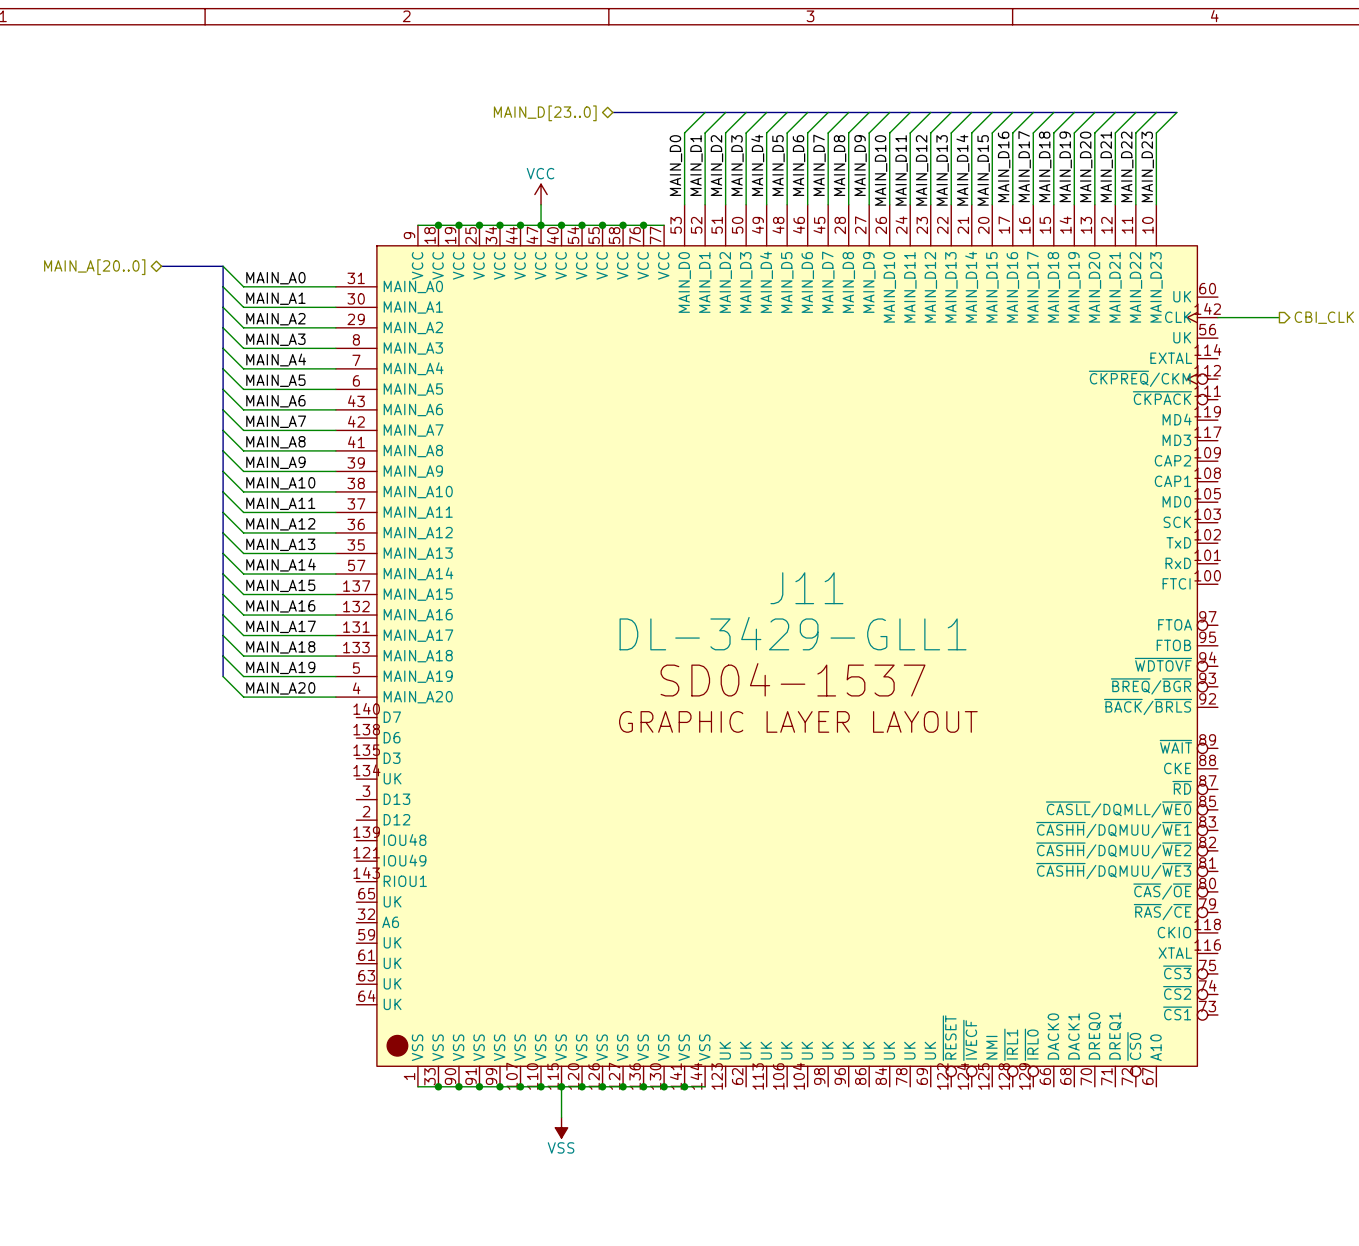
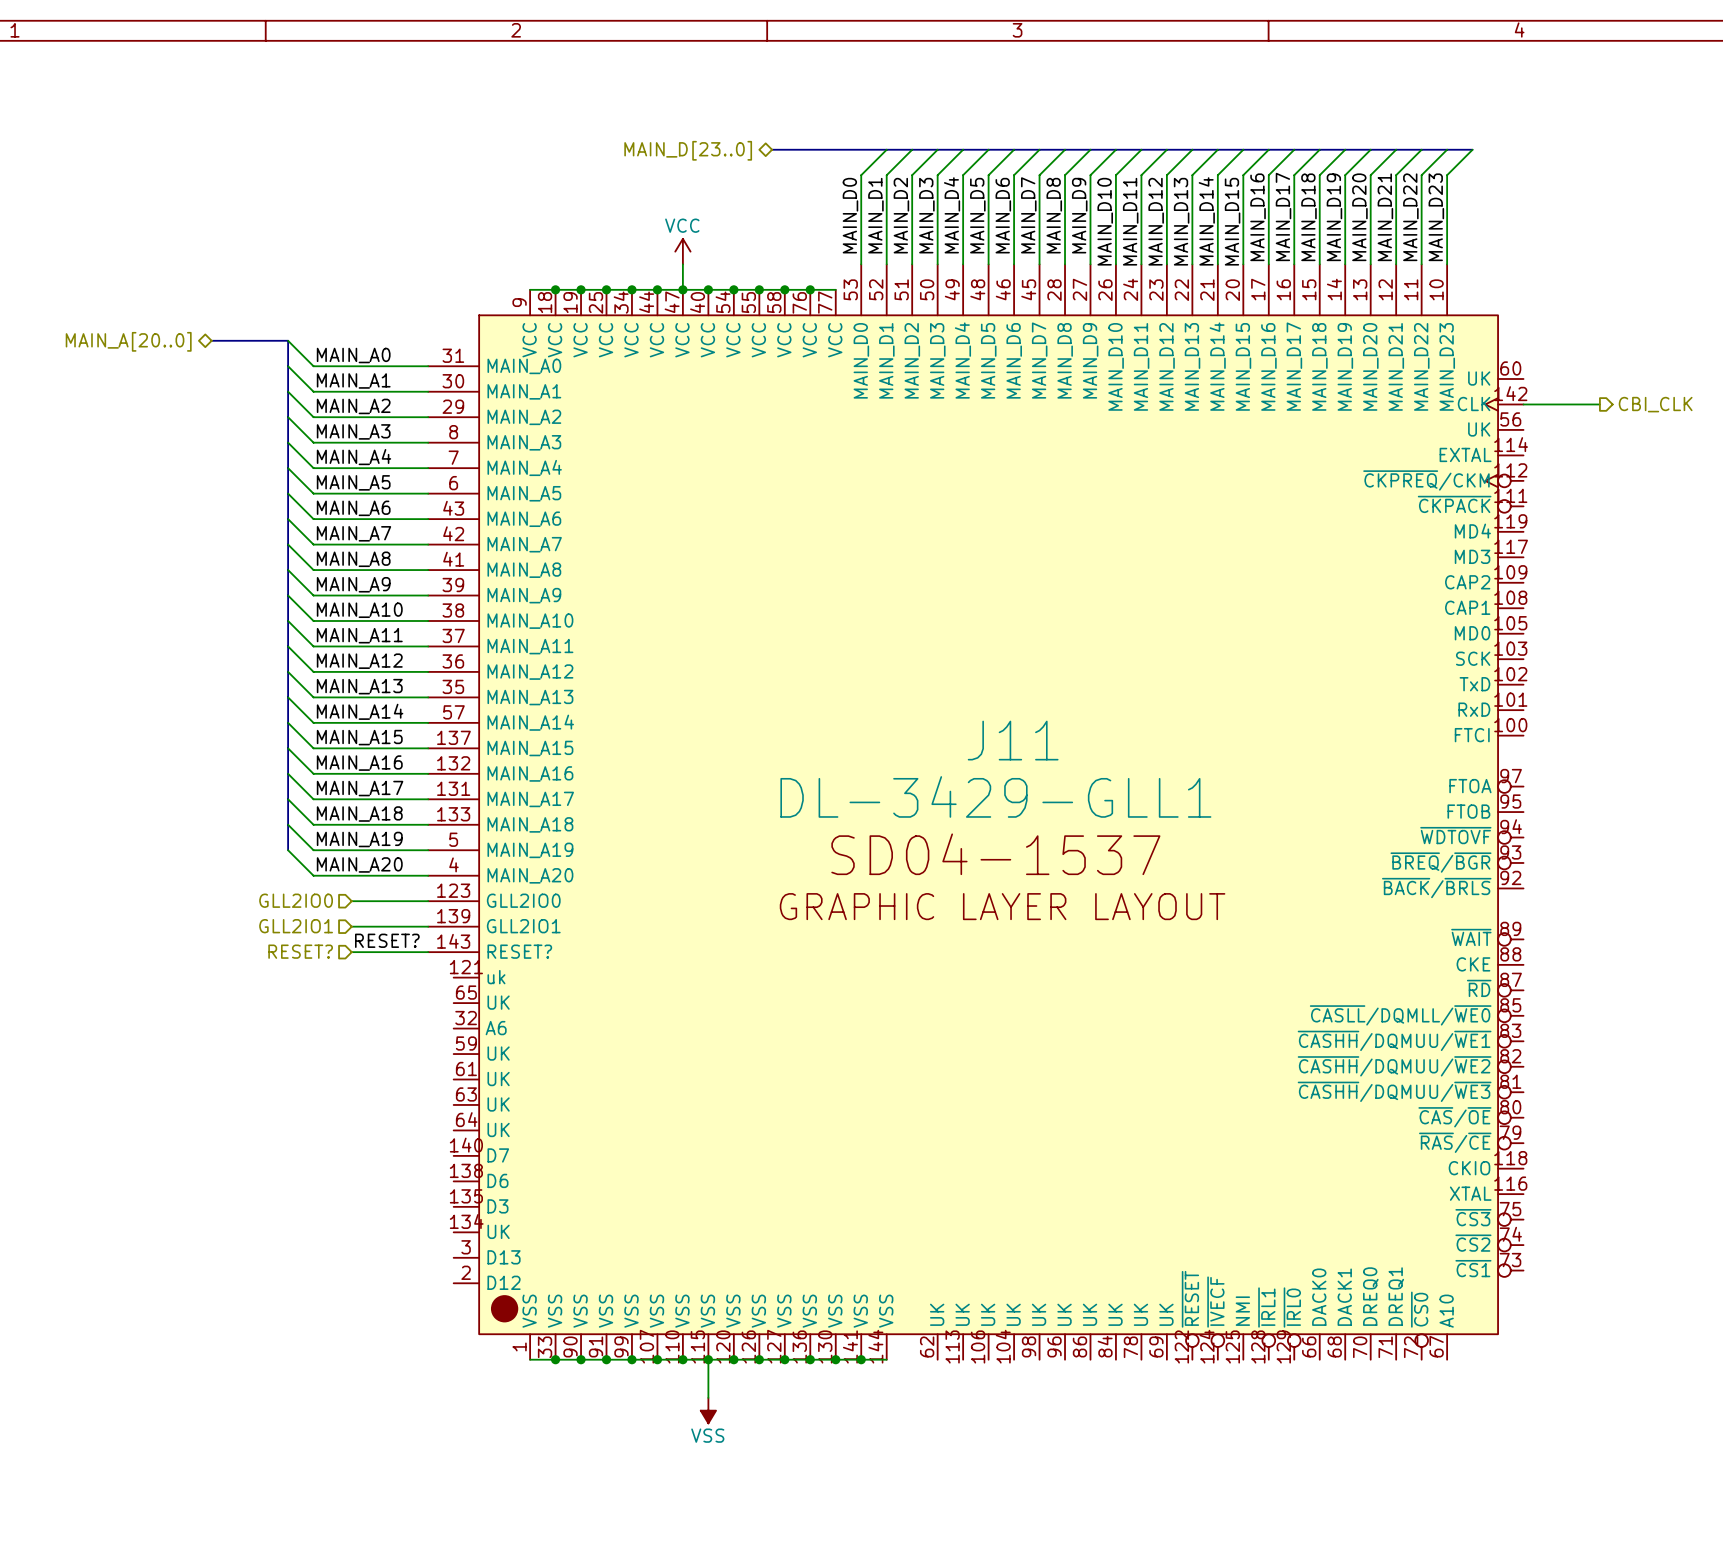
J11 symbol: [335, 204, 1218, 1087] -> [428, 264, 1524, 1360]
hierarchical label: none -> GLL2IO0 (296, 900)
wire: none -> (351, 901) (428, 901)
hierarchical label: none -> GLL2IO1 (296, 926)
wire: none -> (351, 926) (428, 926)
label: none -> RESET? (387, 940)
hierarchical label: none -> RESET? (300, 951)
wire: none -> (351, 952) (428, 952)

